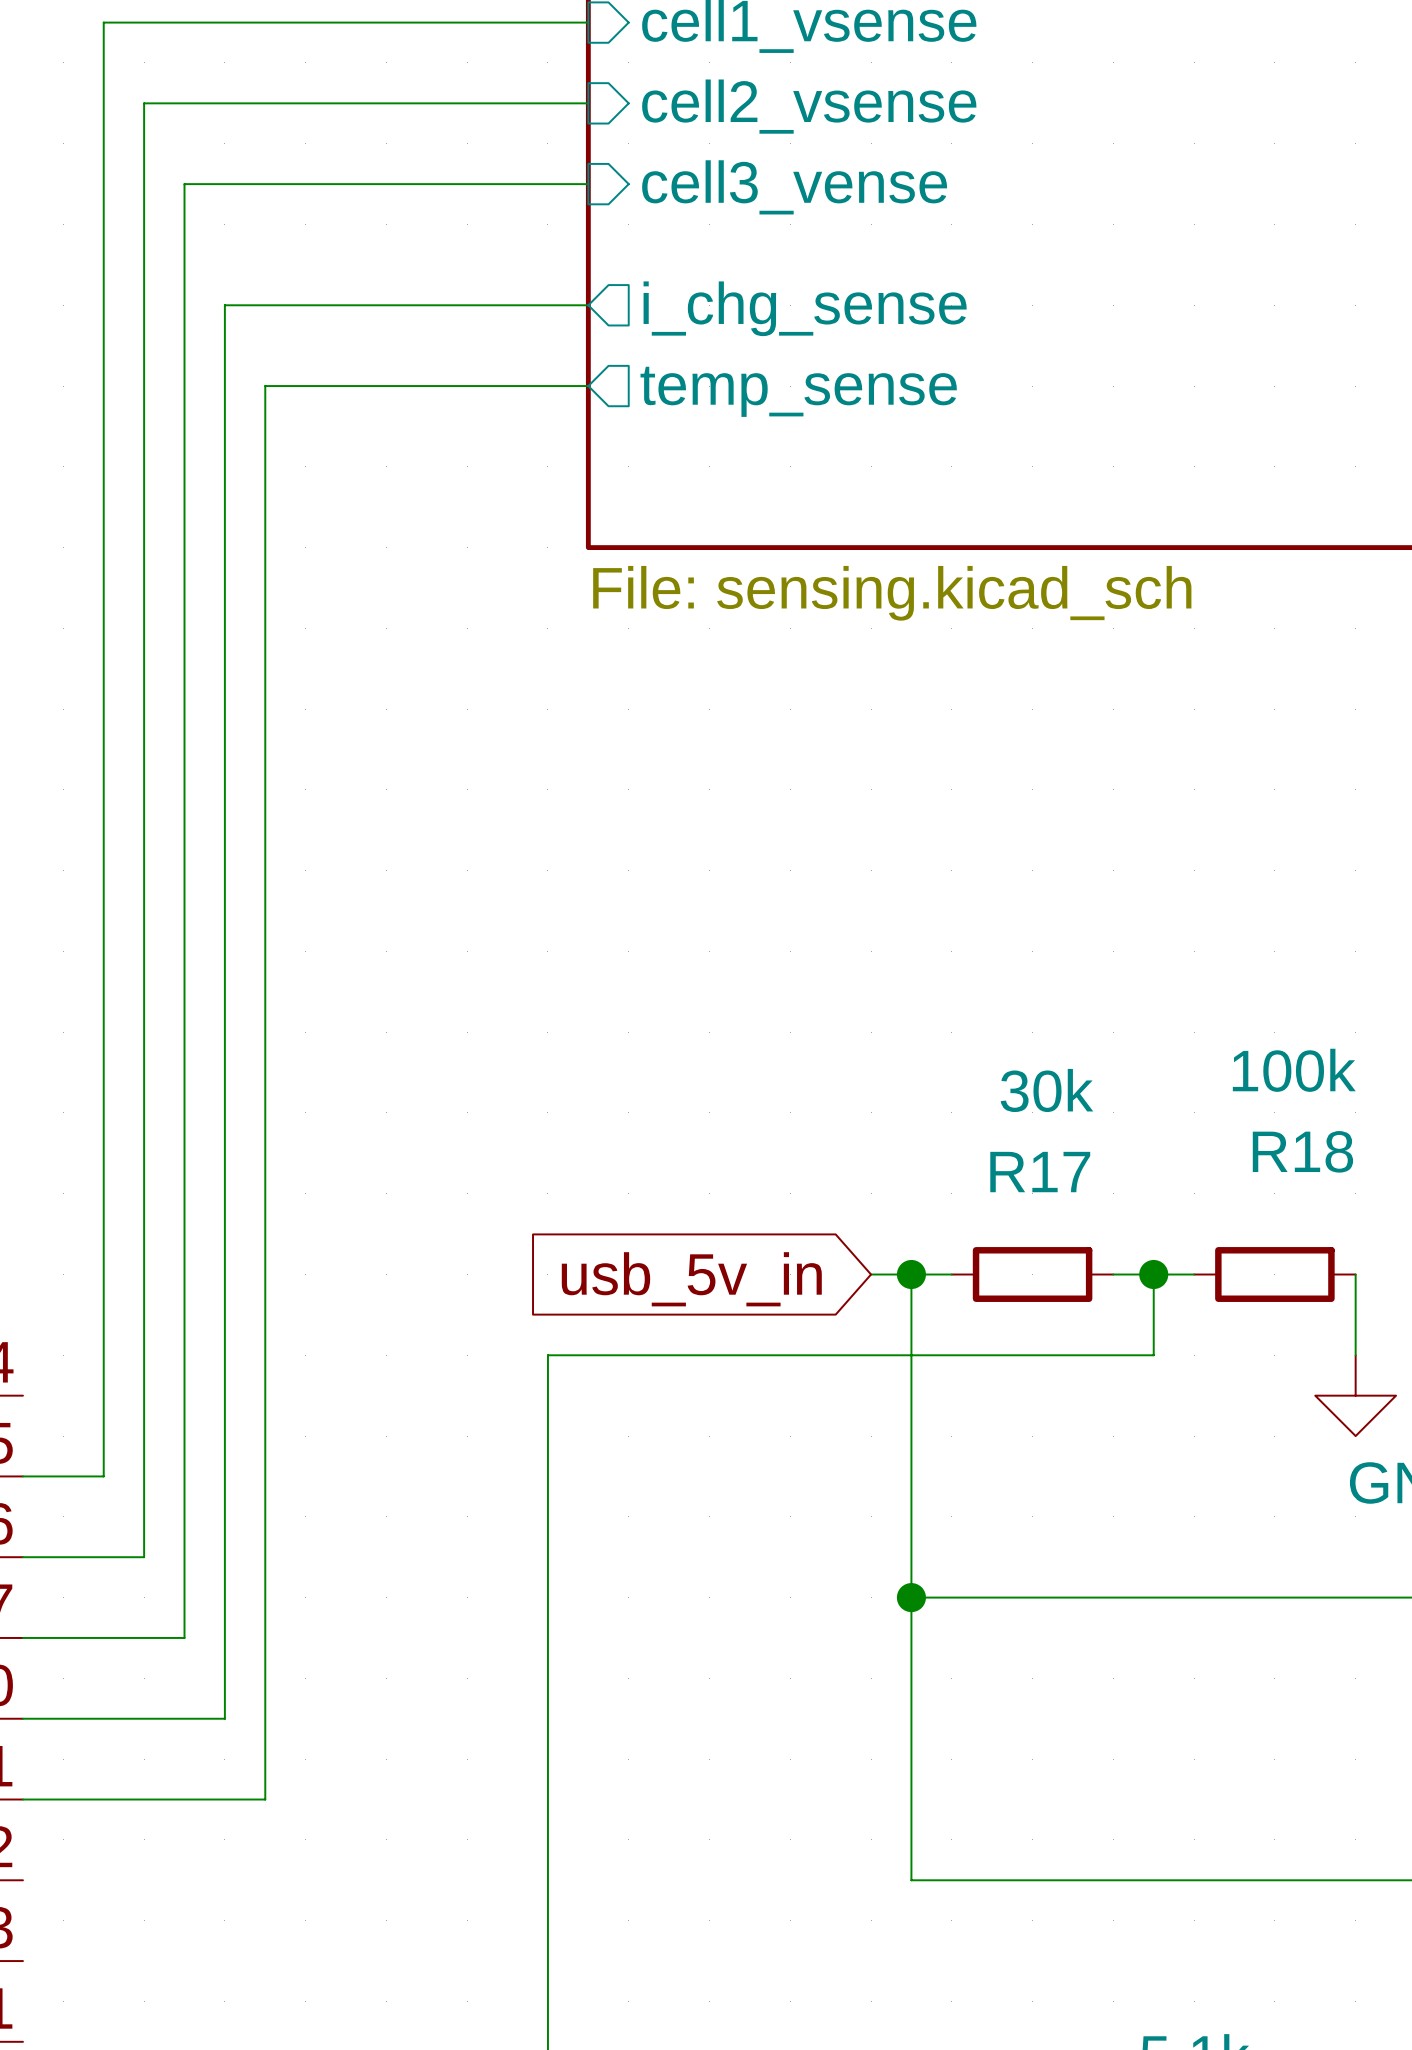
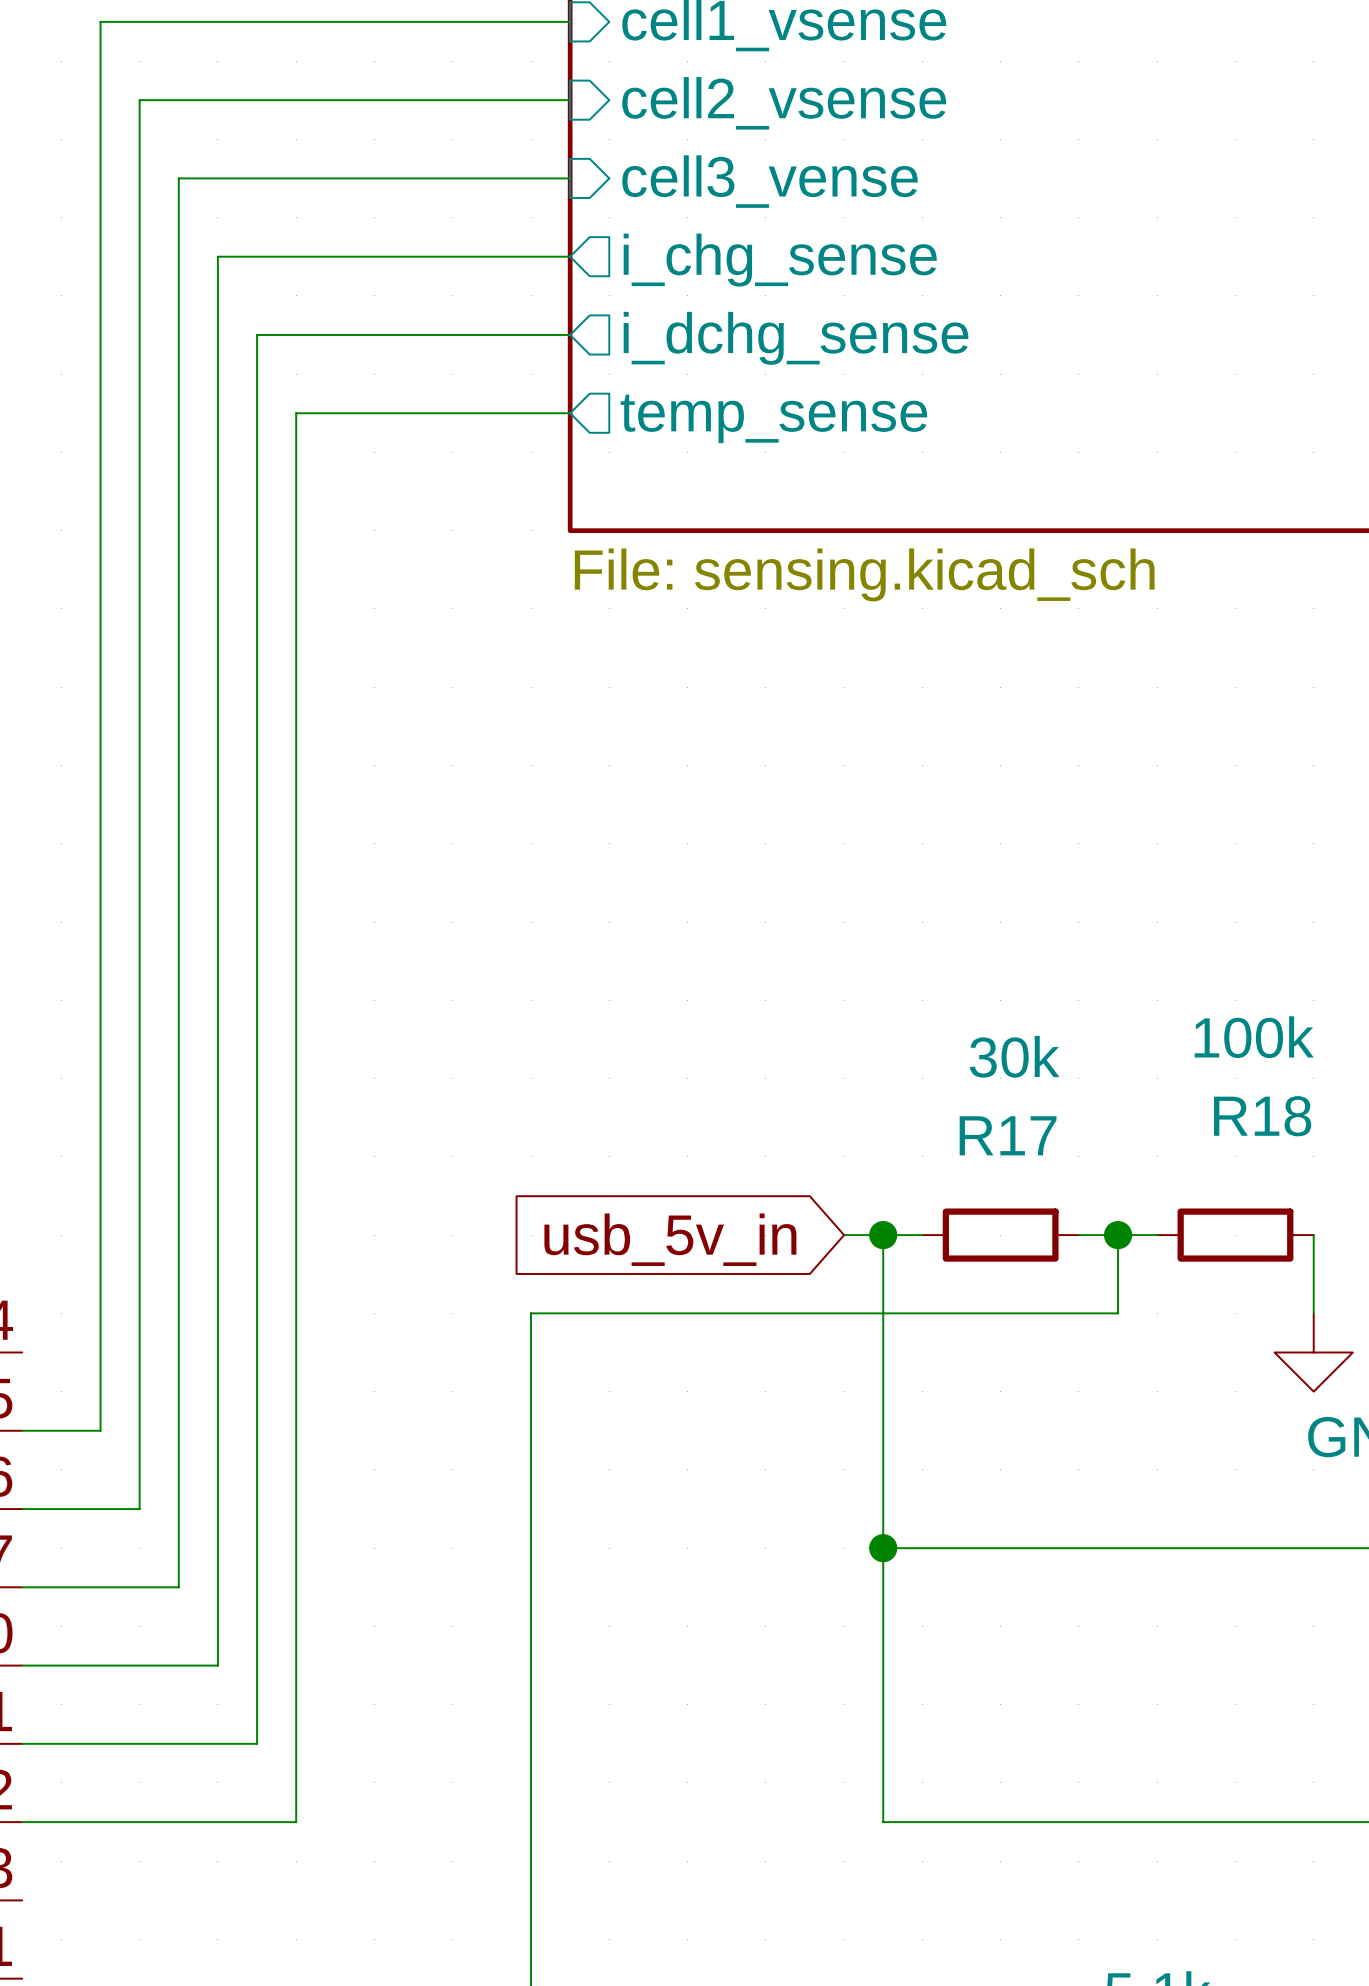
wire: (224, 305) (588, 305) -> (217, 295) (217, 256) (570, 256)
sheet pin position: i_chg_sense (805, 308) -> i_chg_sense (780, 260)
sheet pin: none -> i_dchg_sense (796, 338)
wire: (265, 386) (588, 386) -> (257, 374) (257, 334) (570, 334)
sheet pin position: temp_sense (798, 391) -> temp_sense (773, 418)
wire: none -> (570, 413) (296, 413) (296, 1822) (22, 1822)

